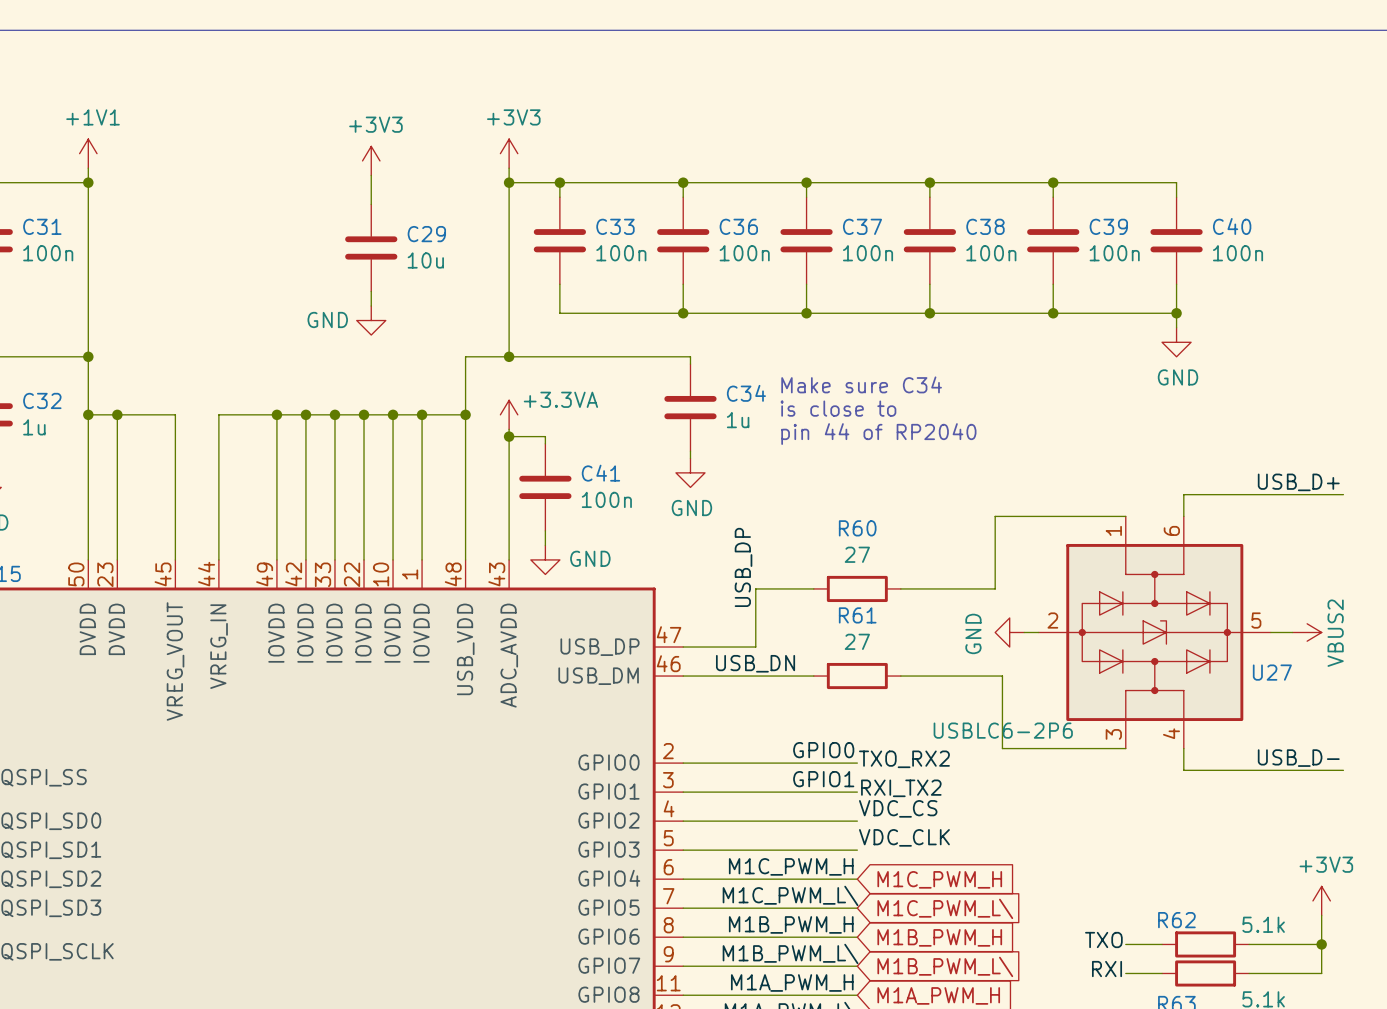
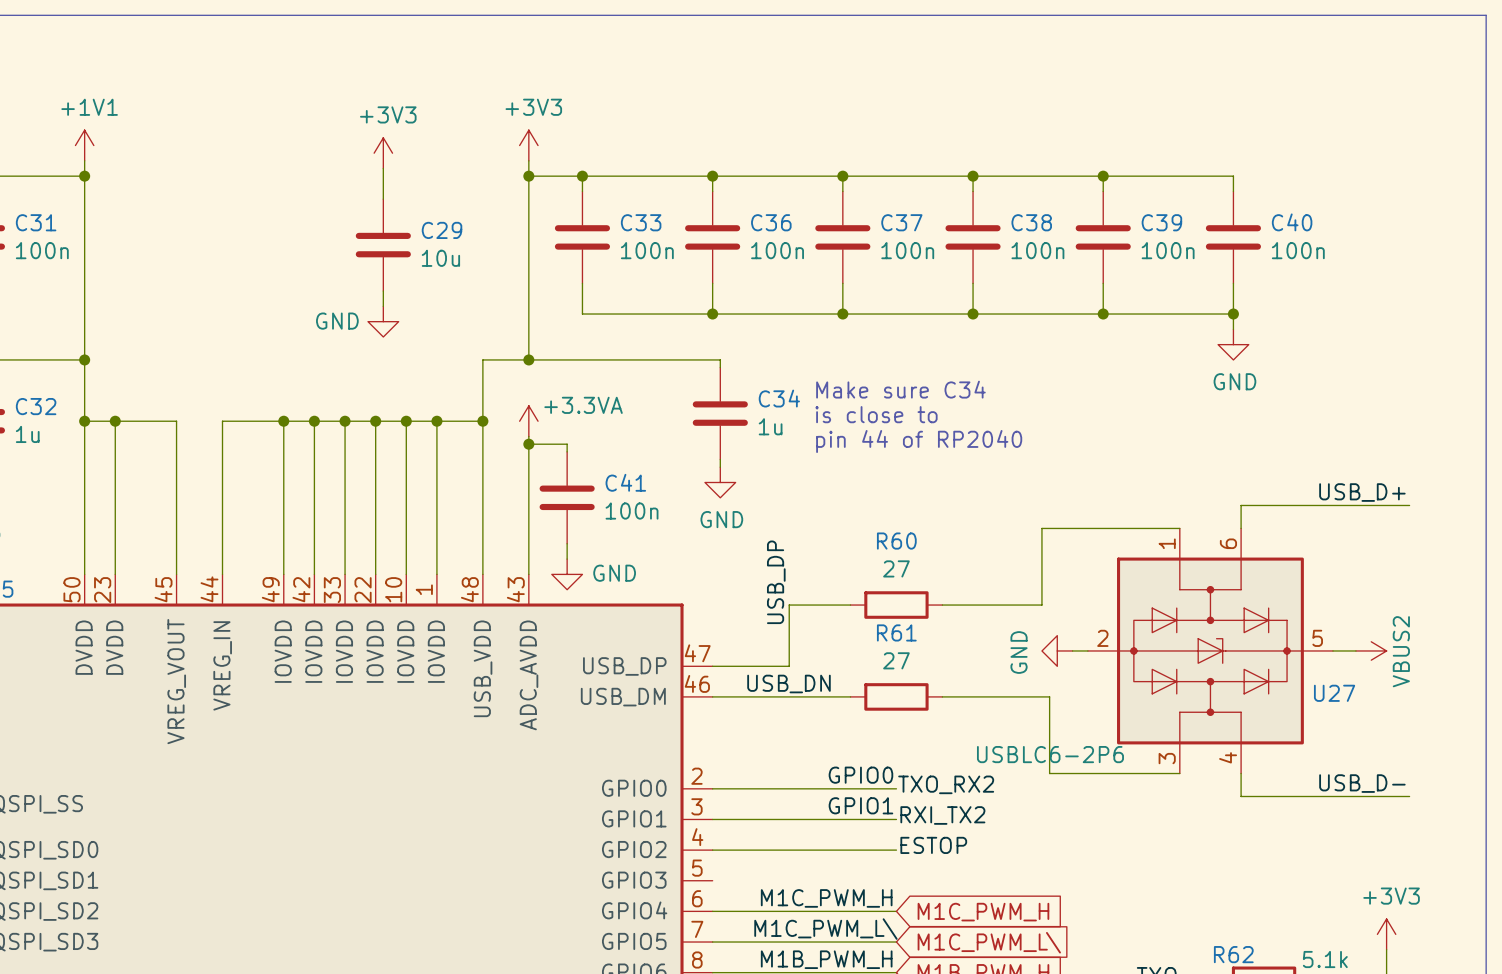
label: VDC_CS (898, 808) -> ESTOP (933, 845)
label: VDC_CLK (904, 837) -> none
wire: (683, 850) (857, 850) -> none

